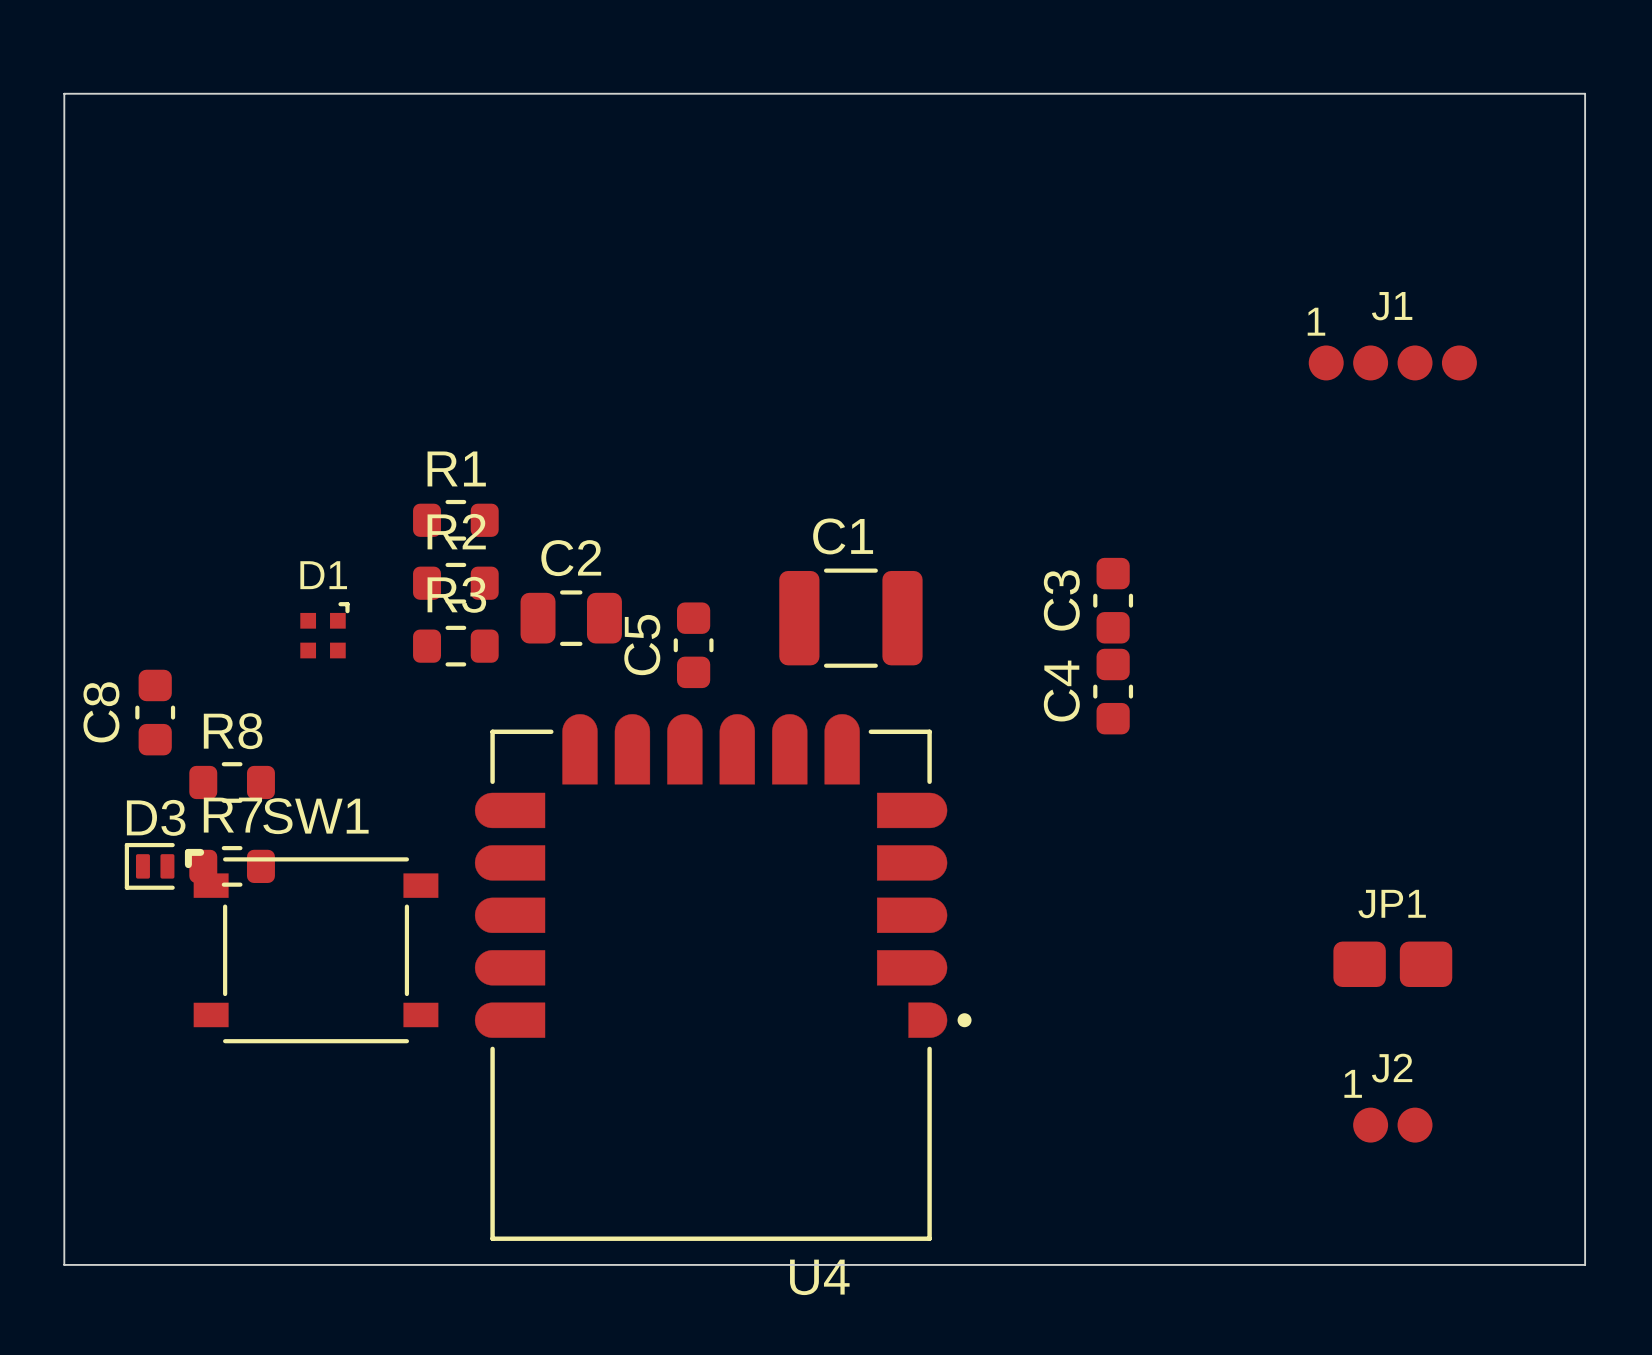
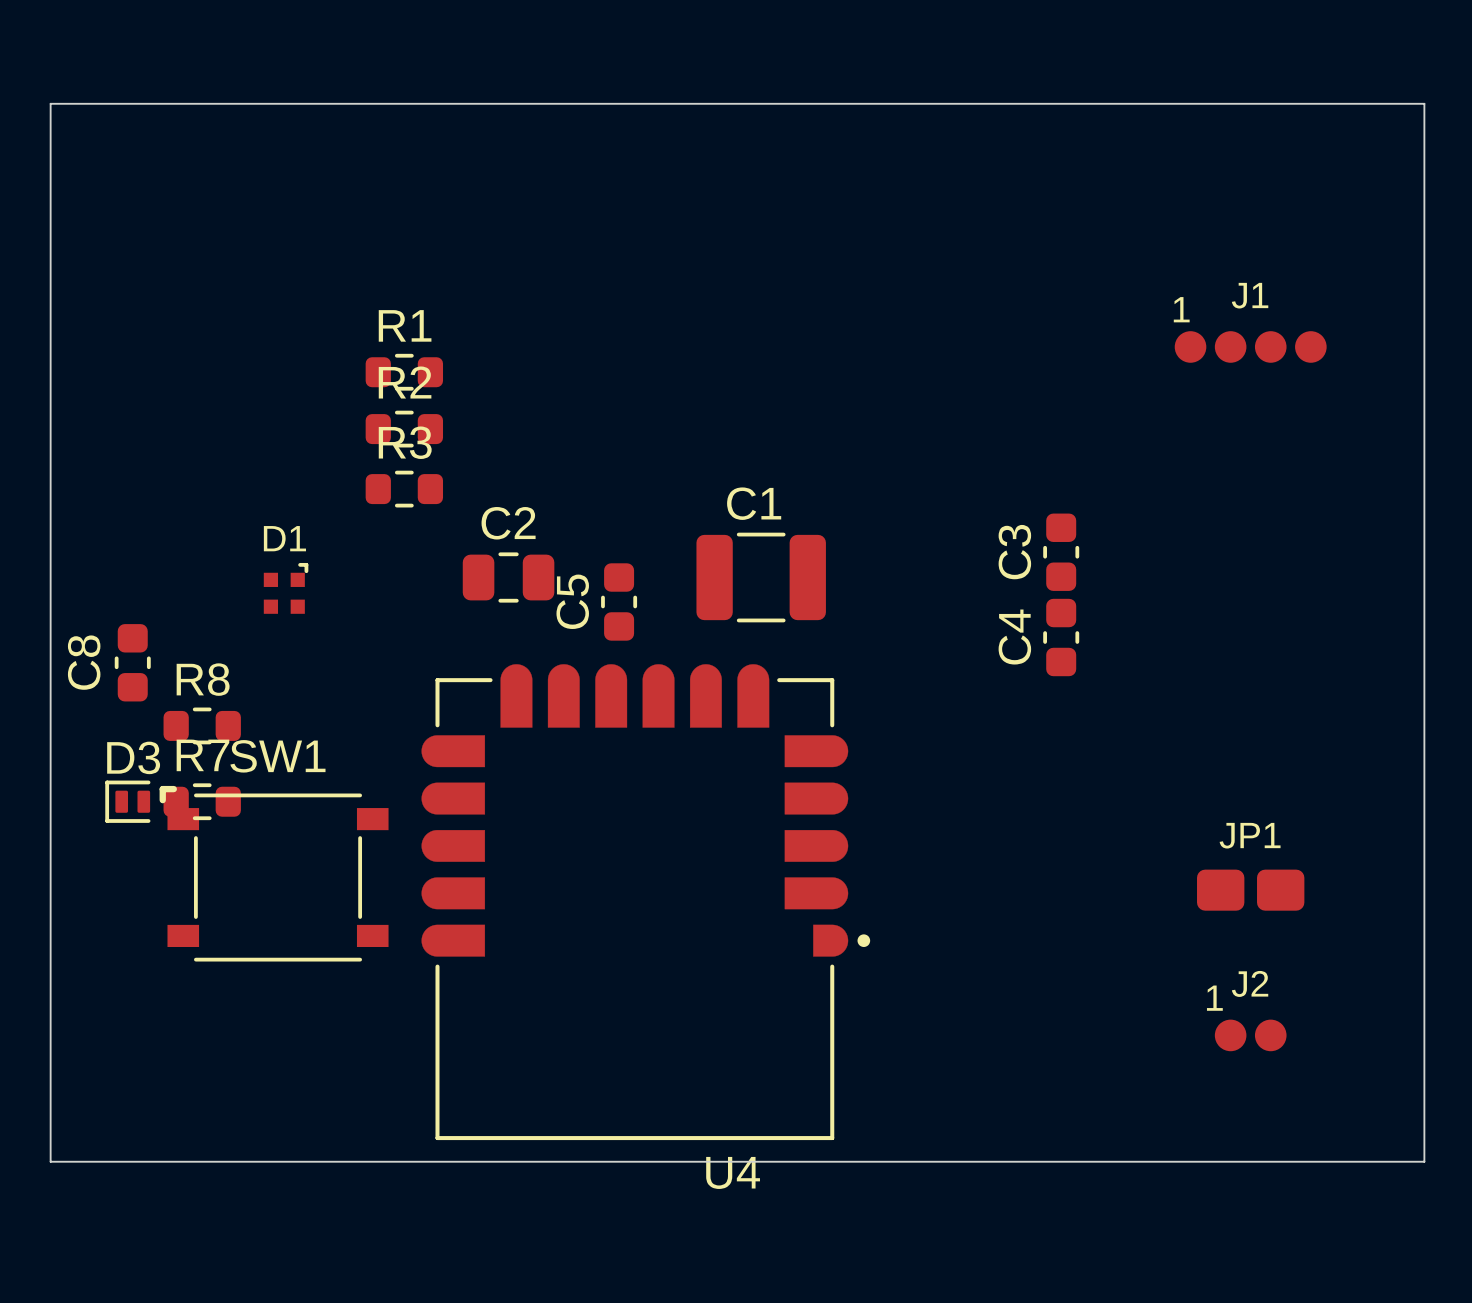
R1: none -> (404, 372)
R1 name: R1 (456, 468) -> R3 (405, 442)
R2 position: (455, 583) -> (404, 429)
C3 position: (1113, 600) -> (1061, 552)
R3: (455, 646) -> none
C4 position: (1113, 691) -> (1061, 637)

